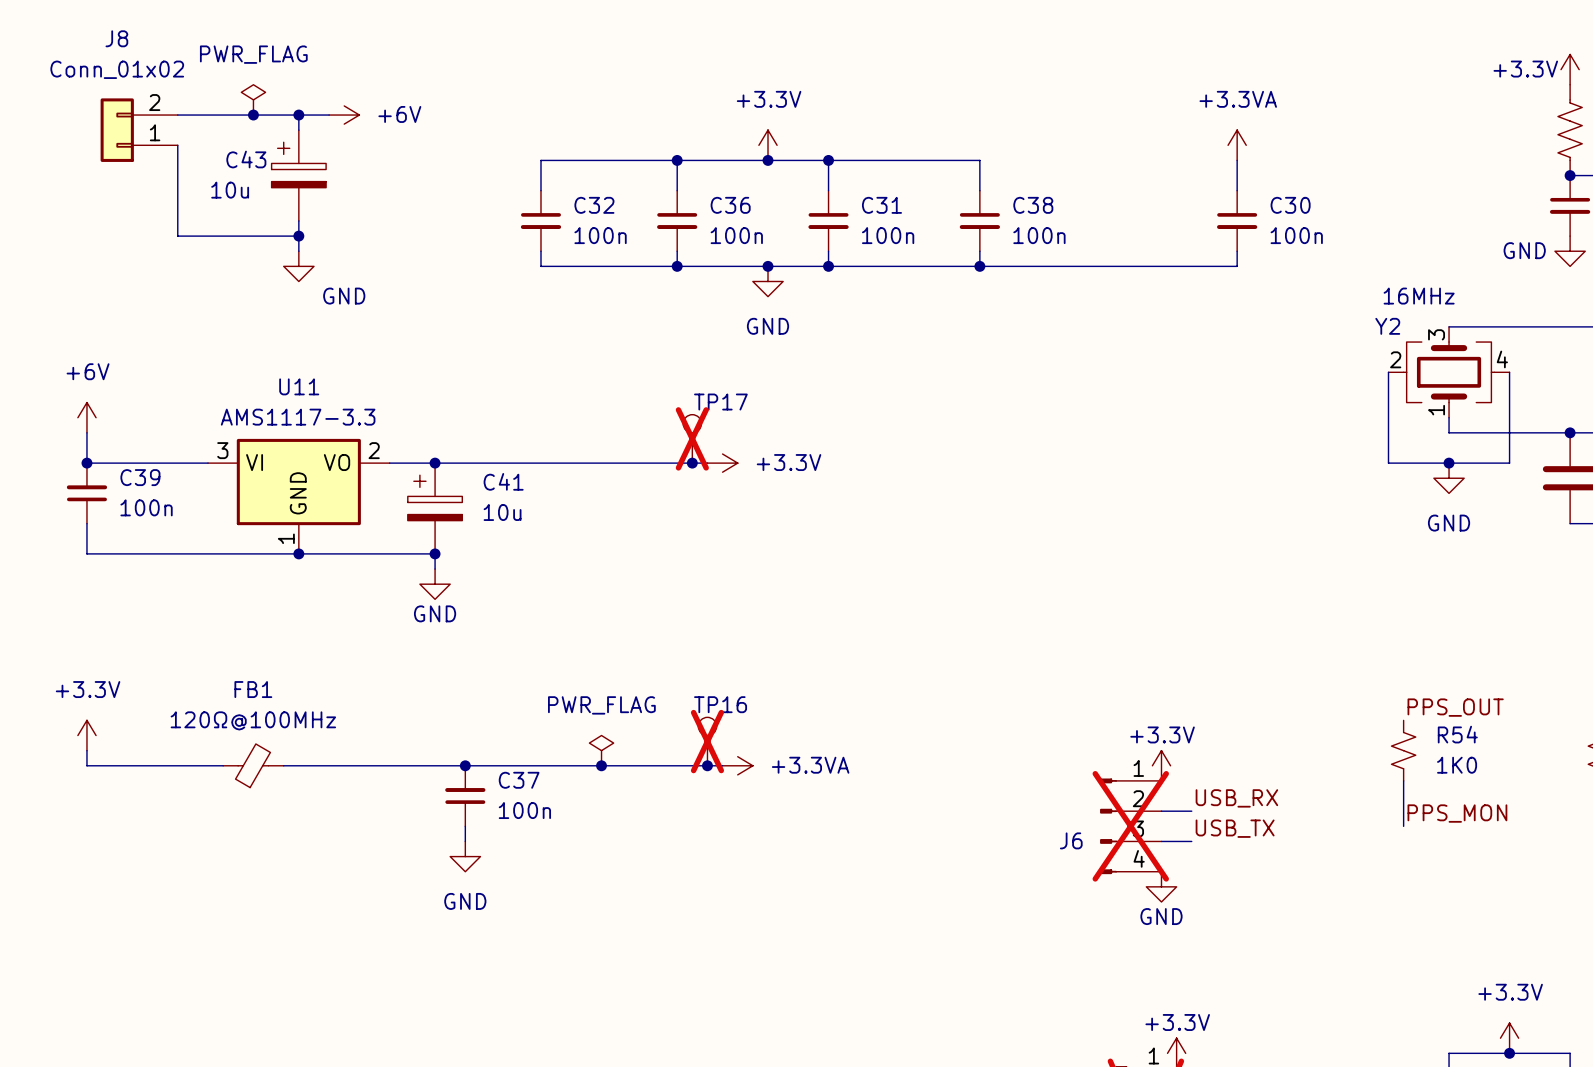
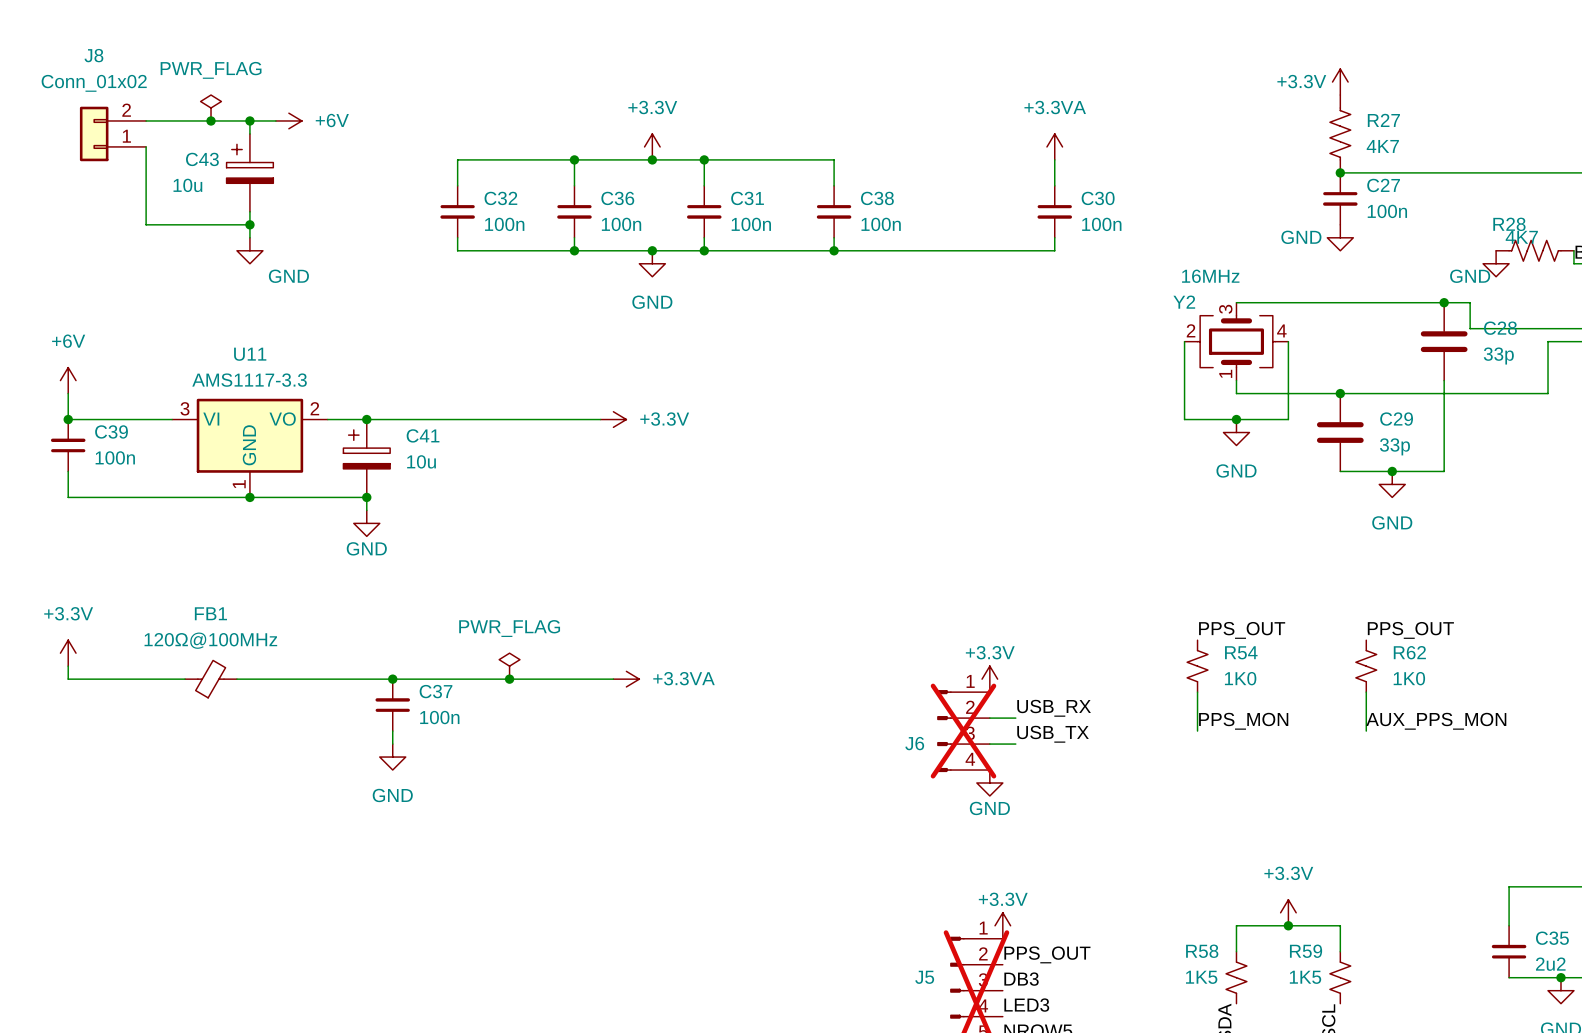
TP17: (692, 438) -> none
junction: (692, 463) -> none
TP16: (707, 741) -> none
junction: (707, 765) -> none

